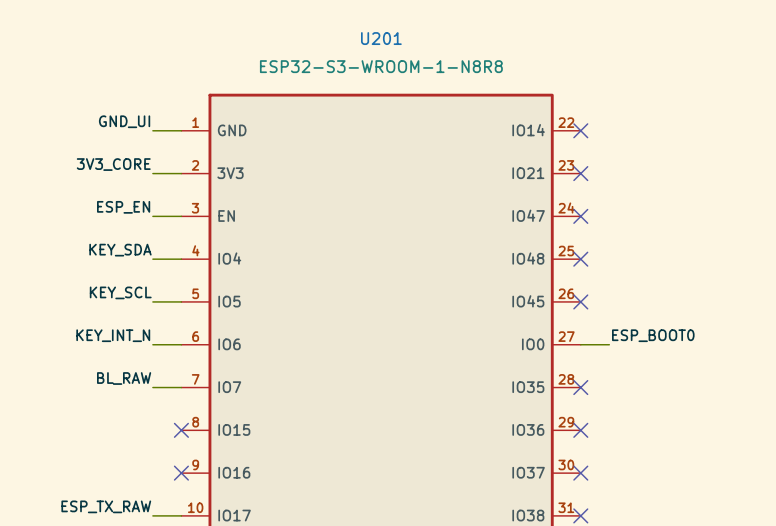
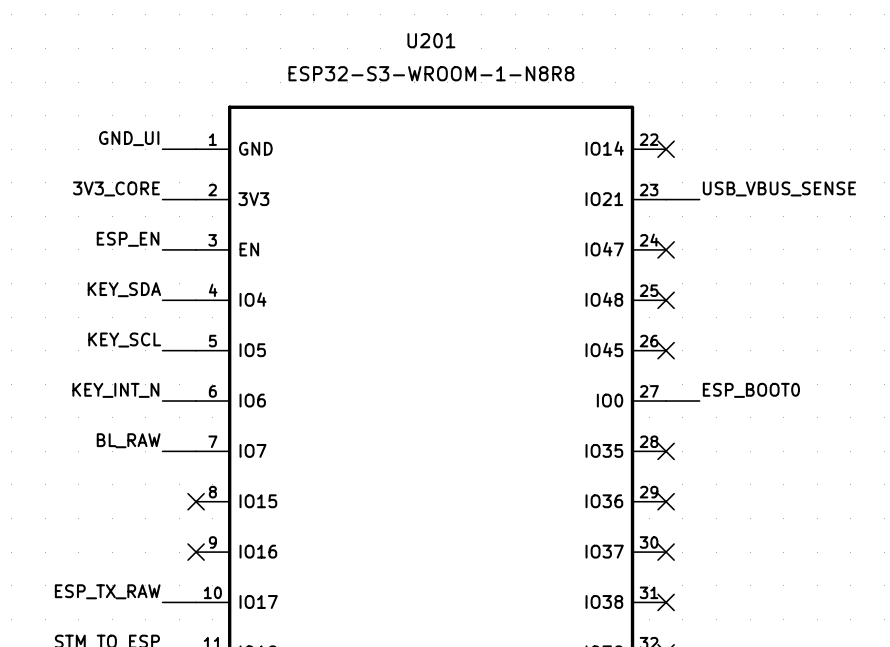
label: none -> USB_VBUS_SENSE (779, 188)
wire: none -> (666, 199) (699, 199)
no-connect mark: (580, 173) -> none

